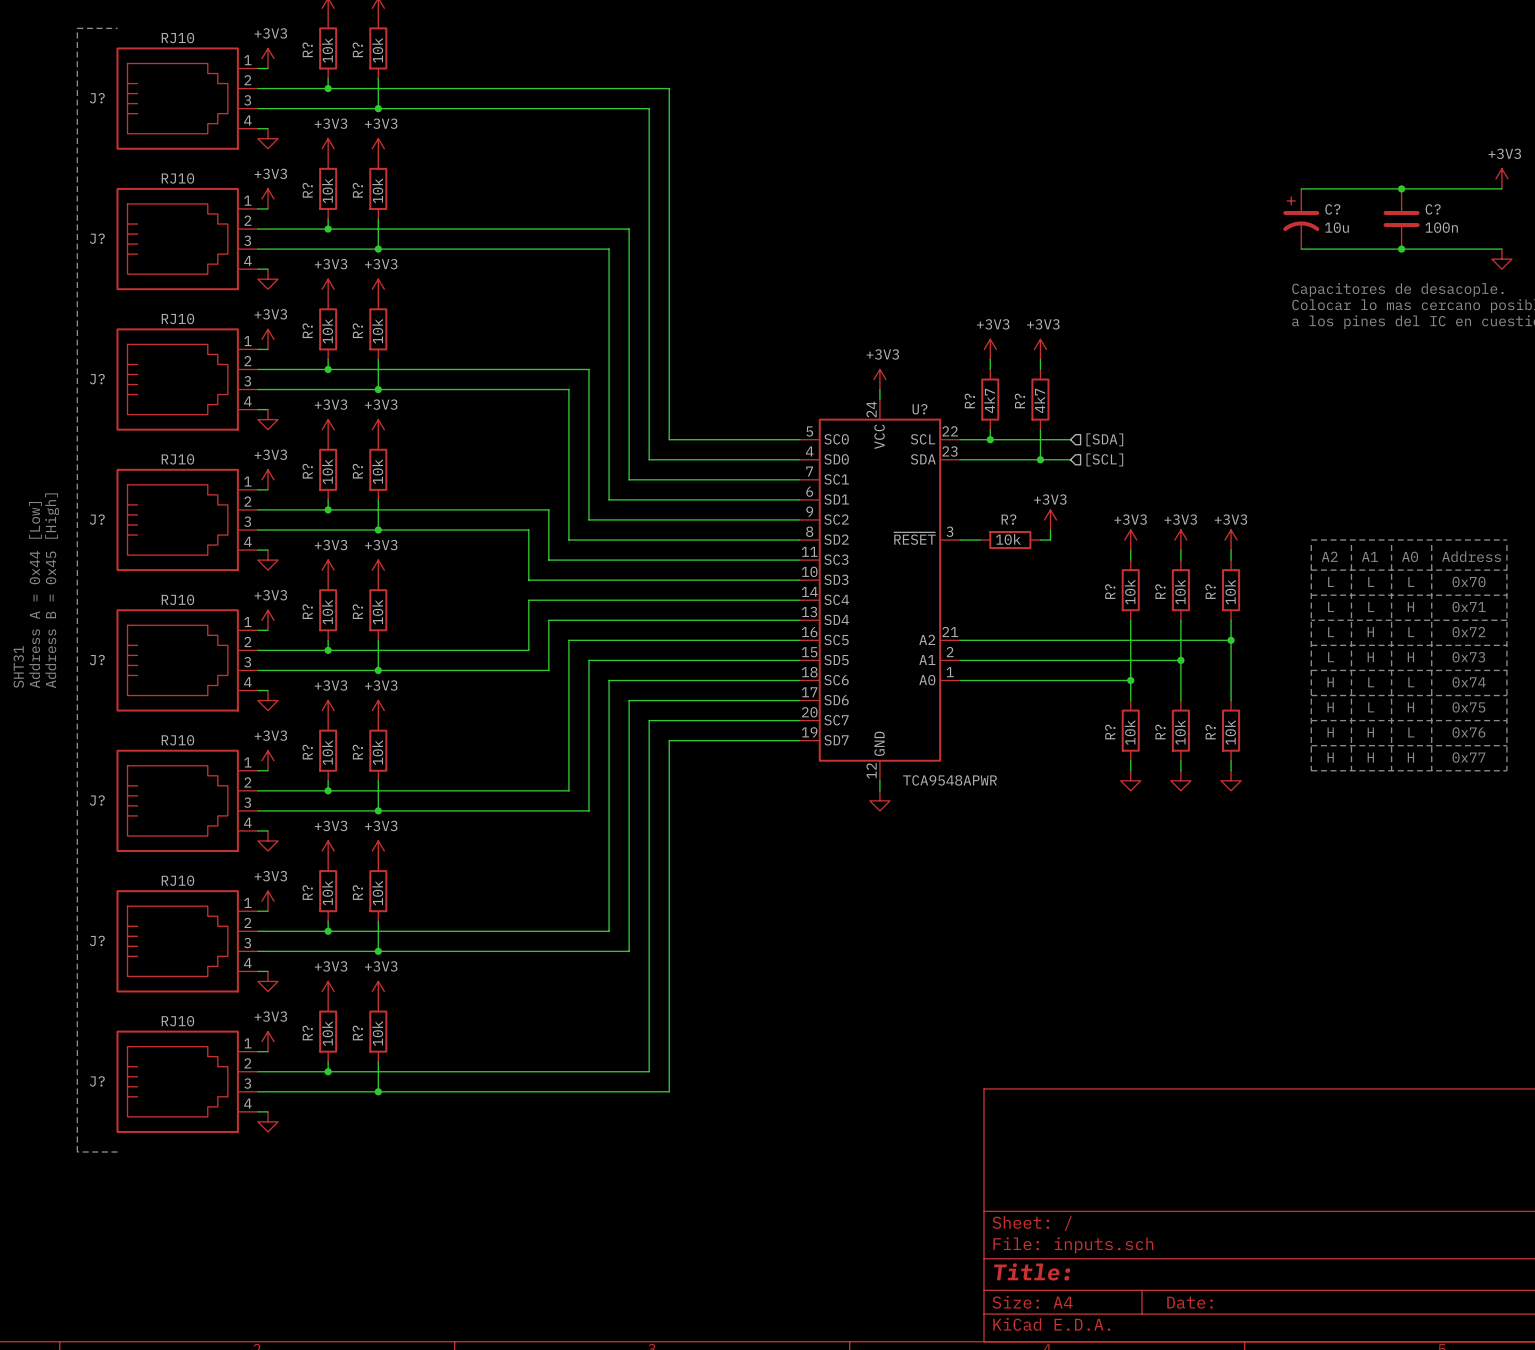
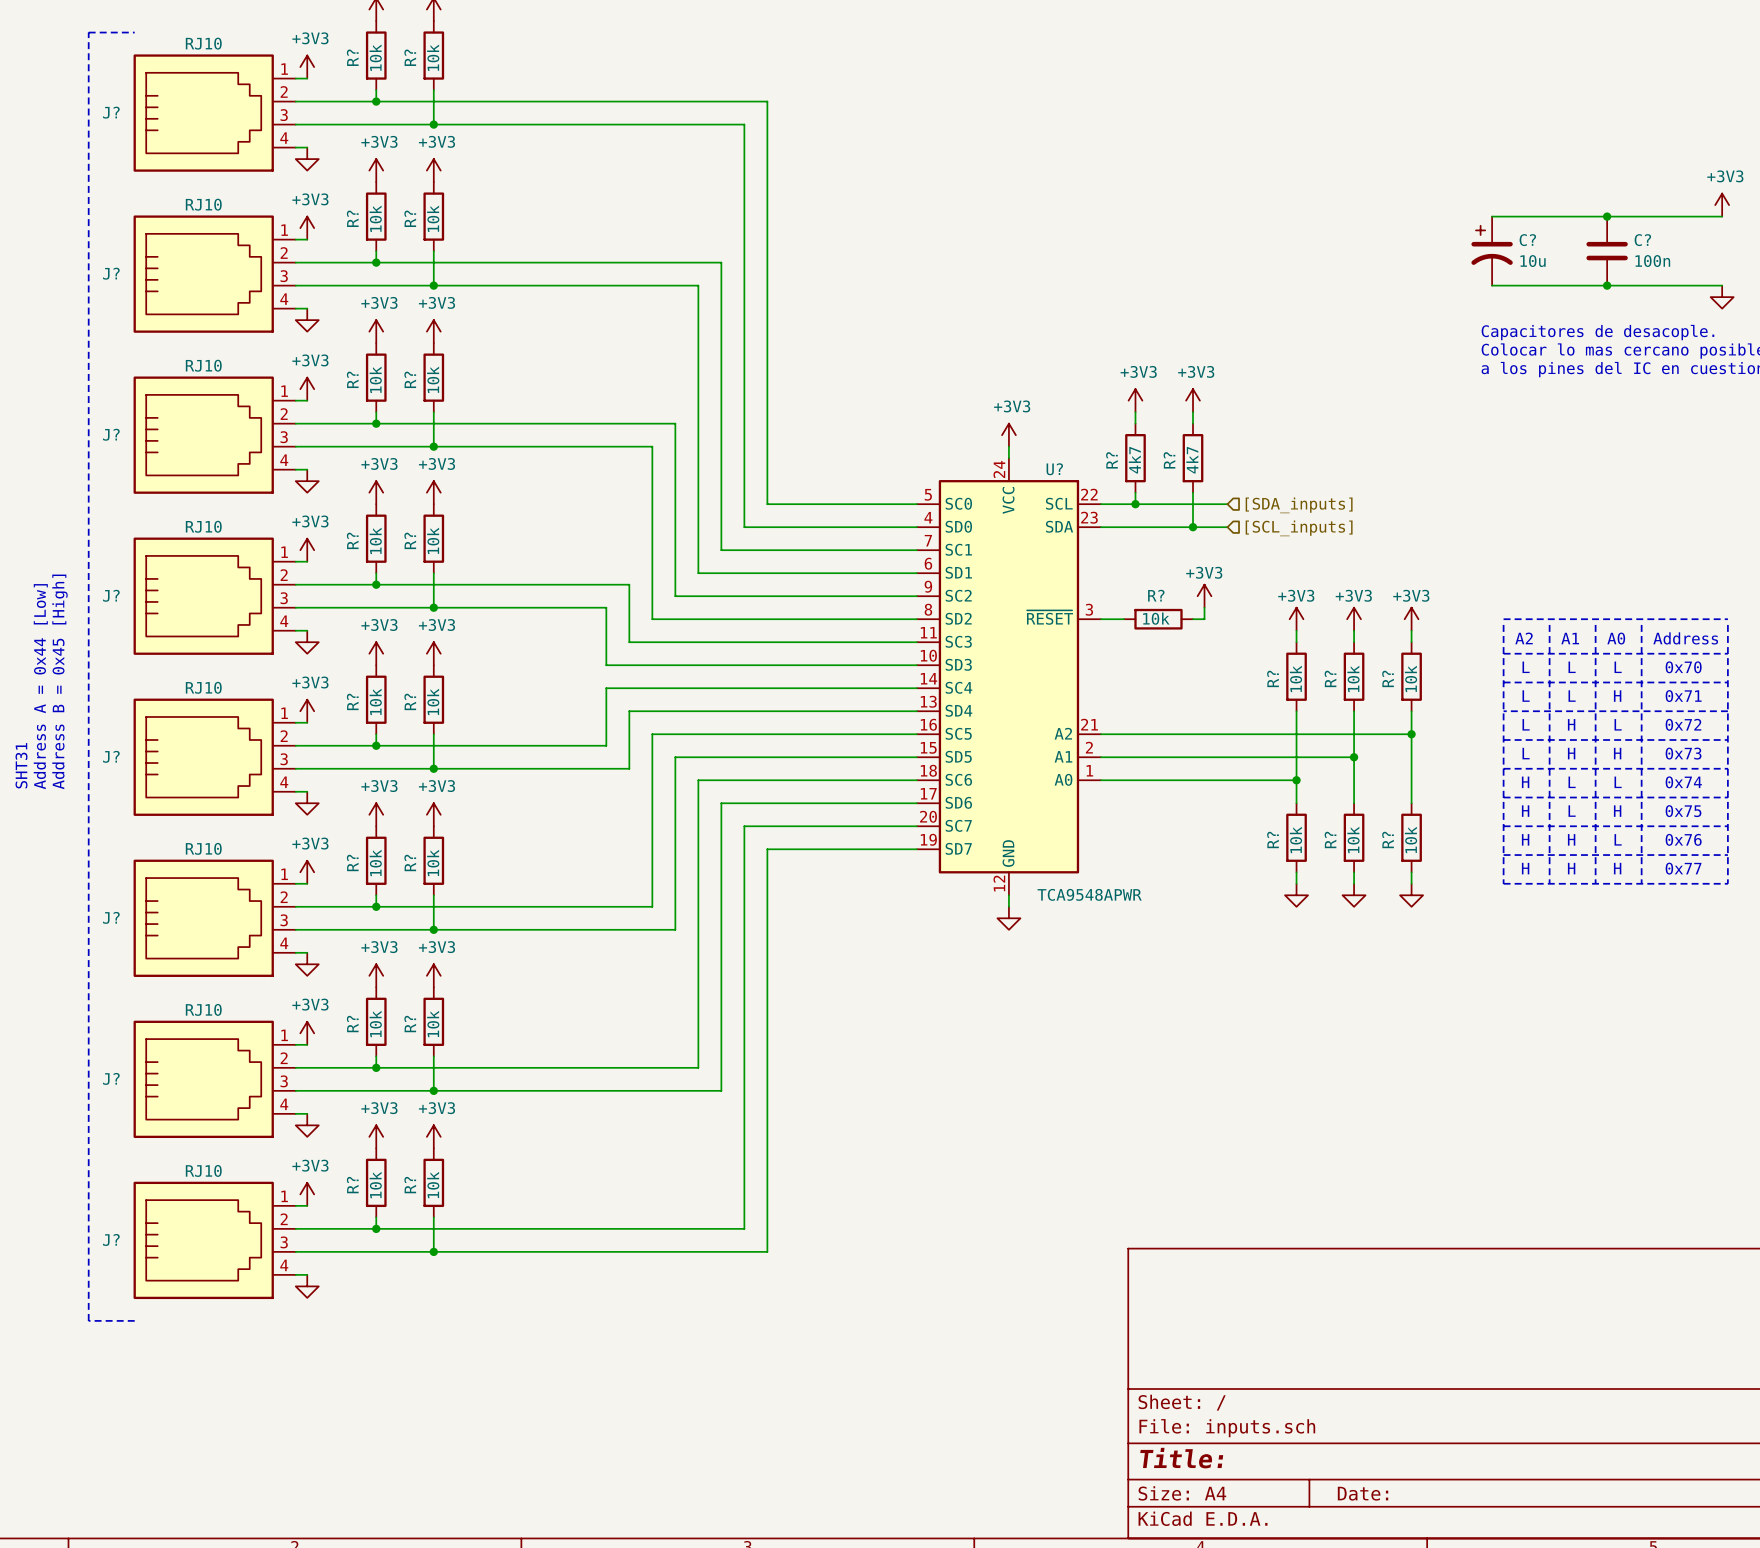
hierarchical label: [SDA] (1104, 439) -> [SDA_inputs] (1299, 505)
hierarchical label: [SCL] (1104, 459) -> [SCL_inputs] (1299, 528)

